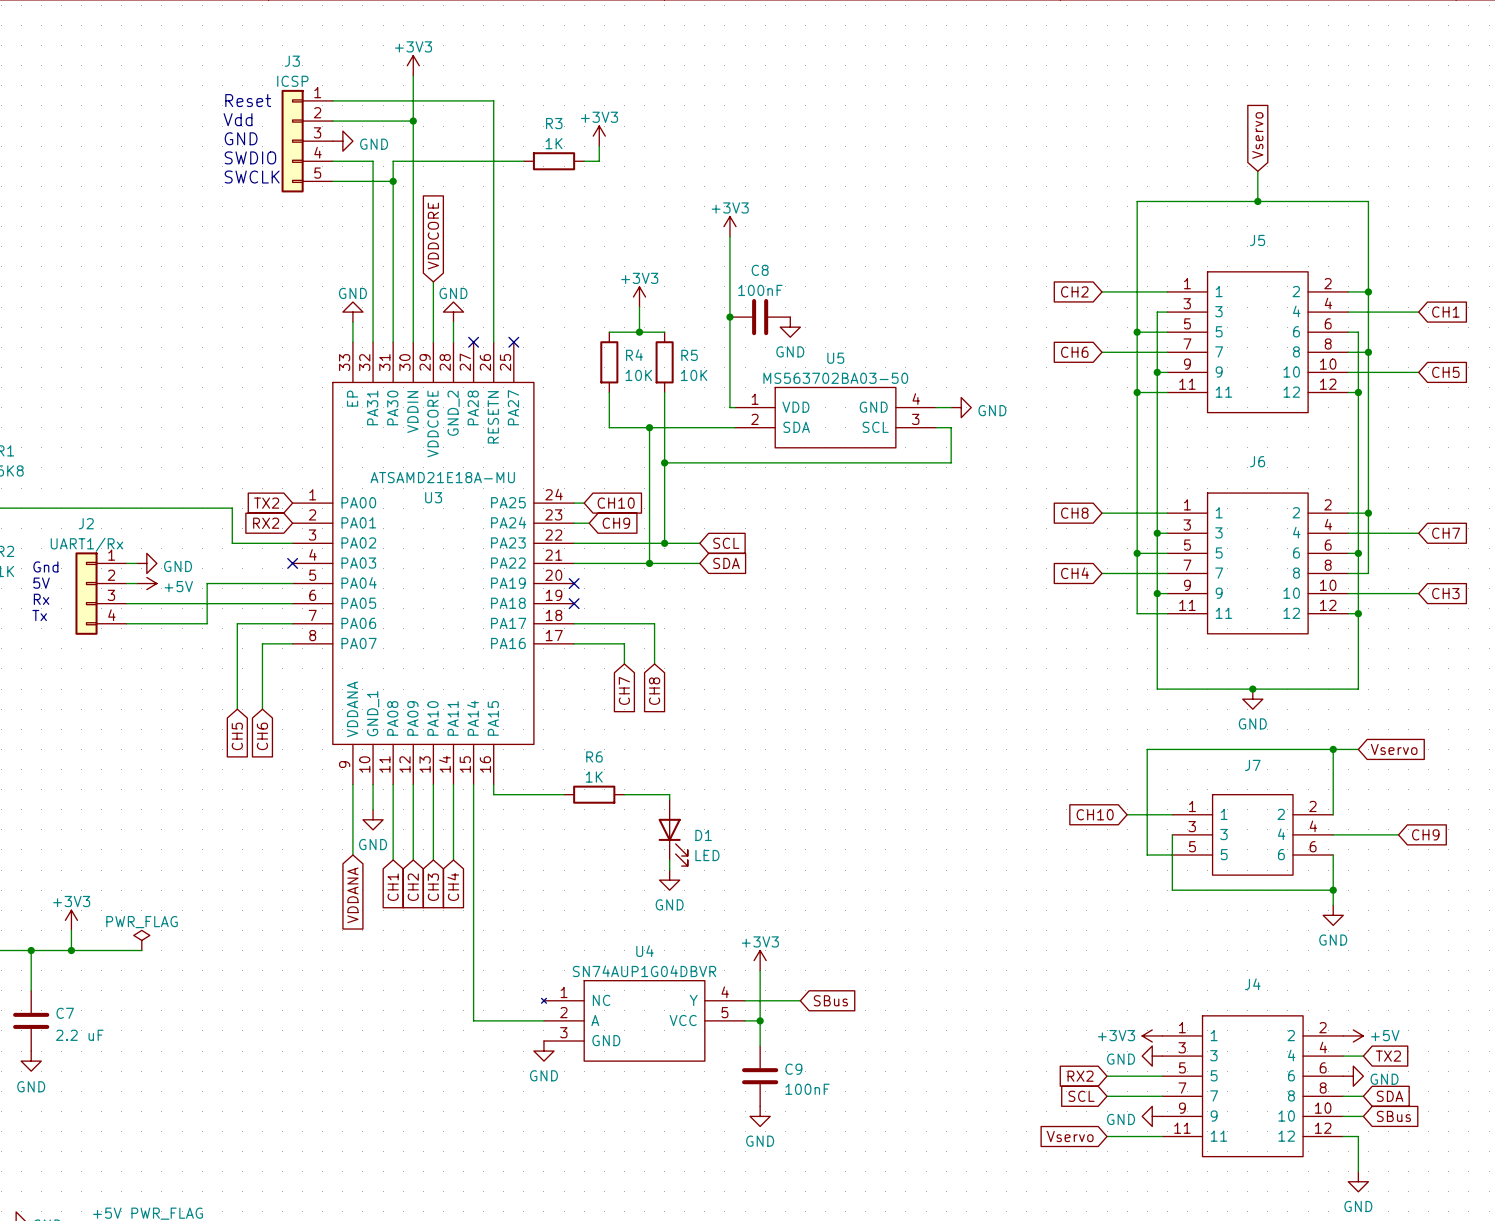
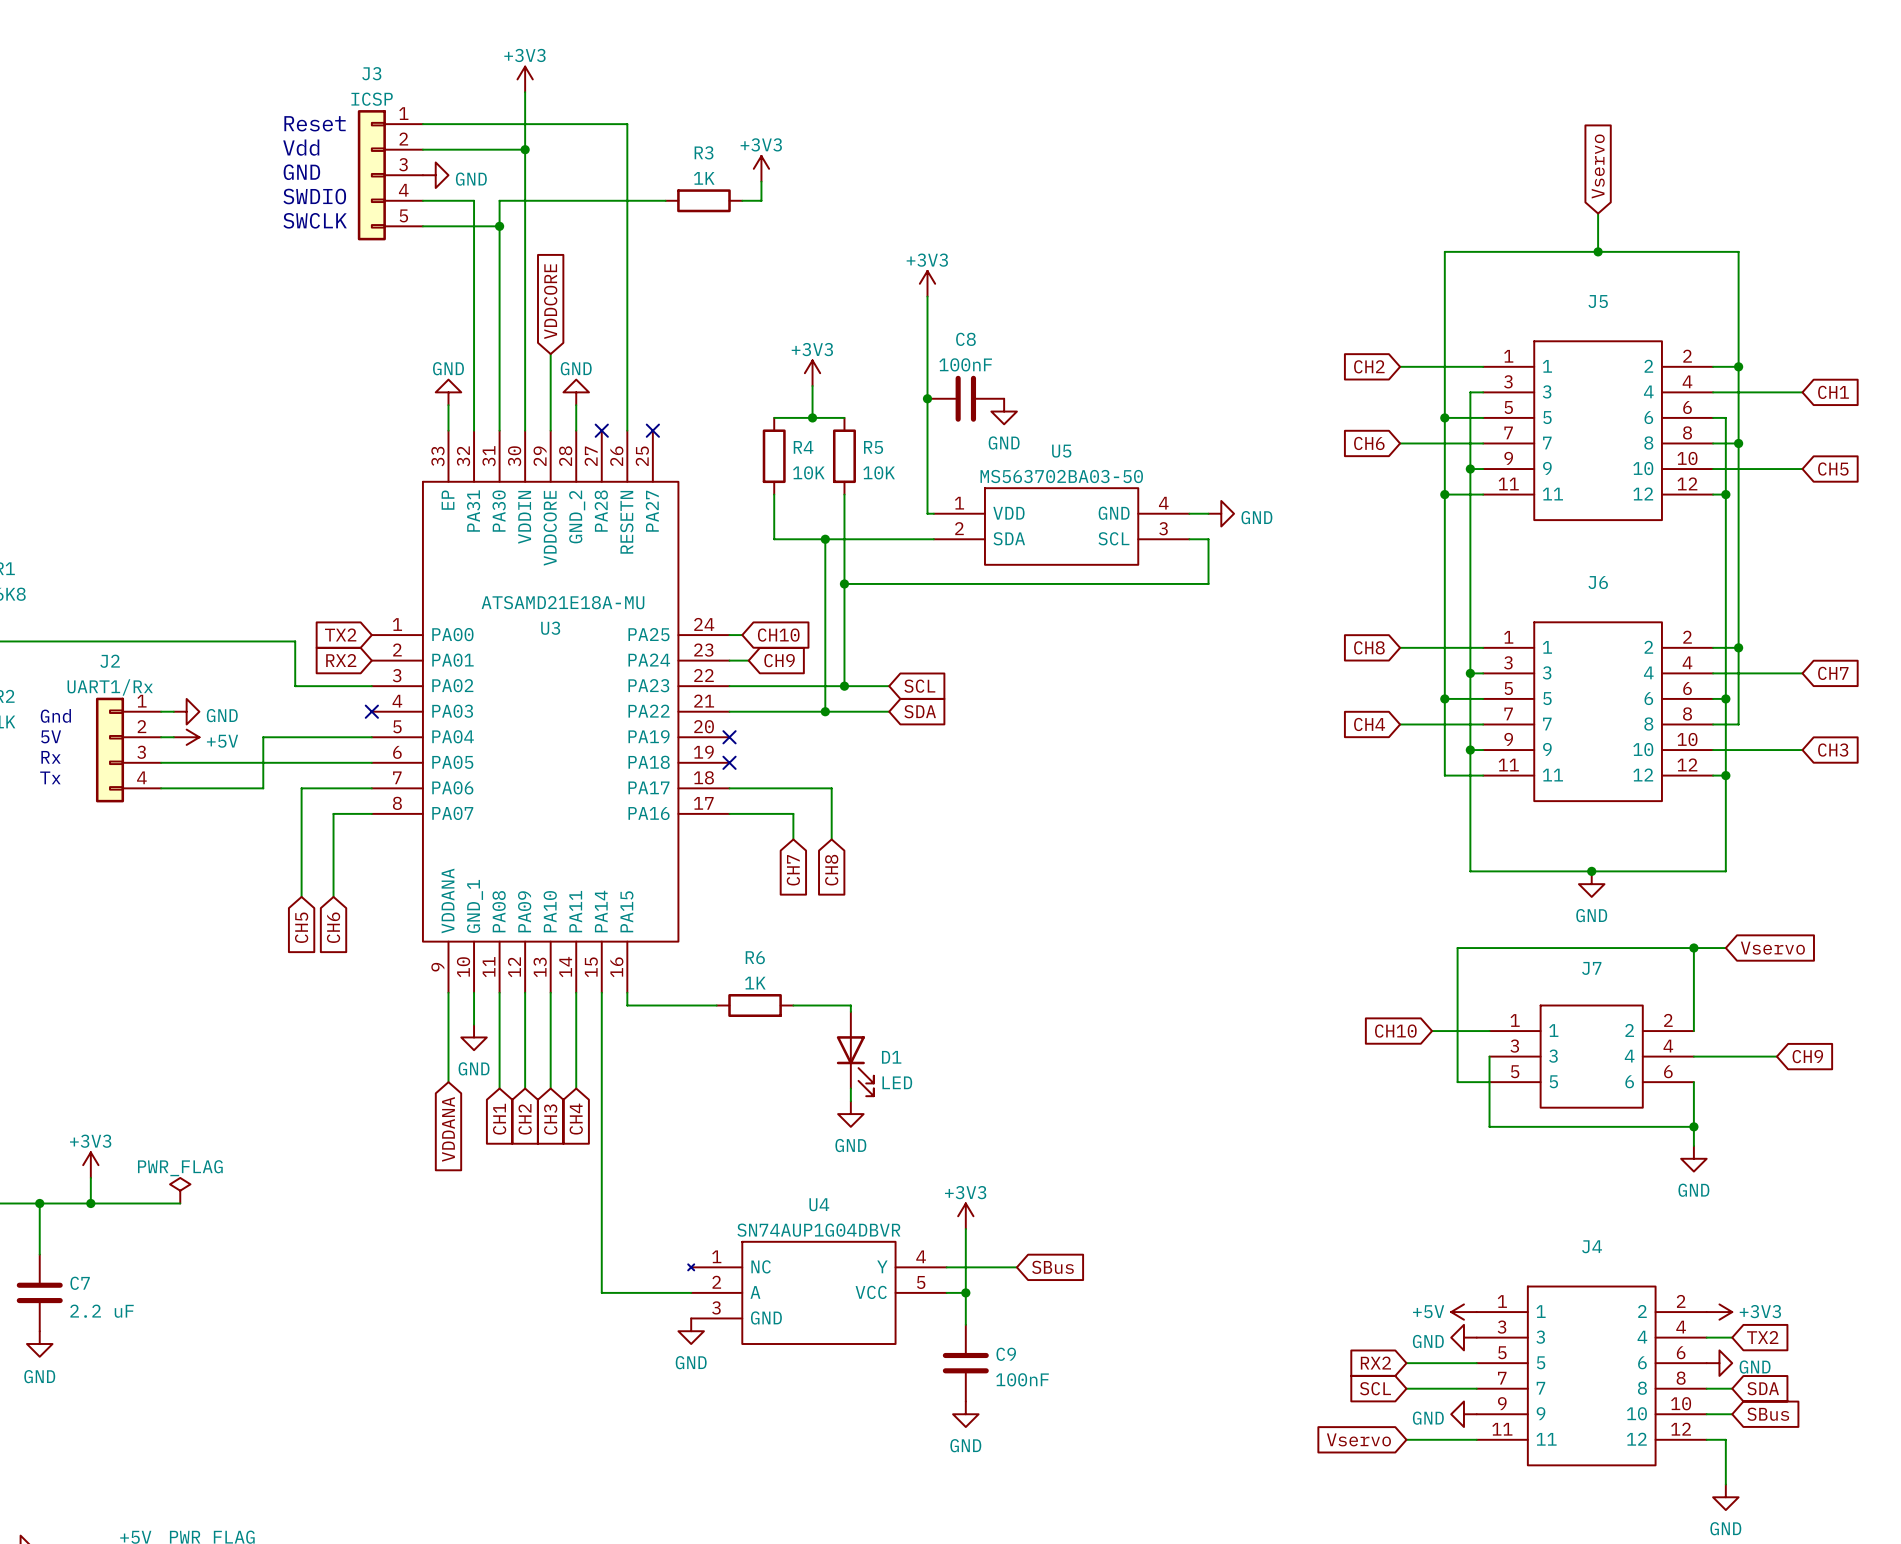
power symbol: +3V3 (1152, 1035) -> +5V (1463, 1312)
power symbol: +5V (1353, 1035) -> +3V3 (1719, 1312)

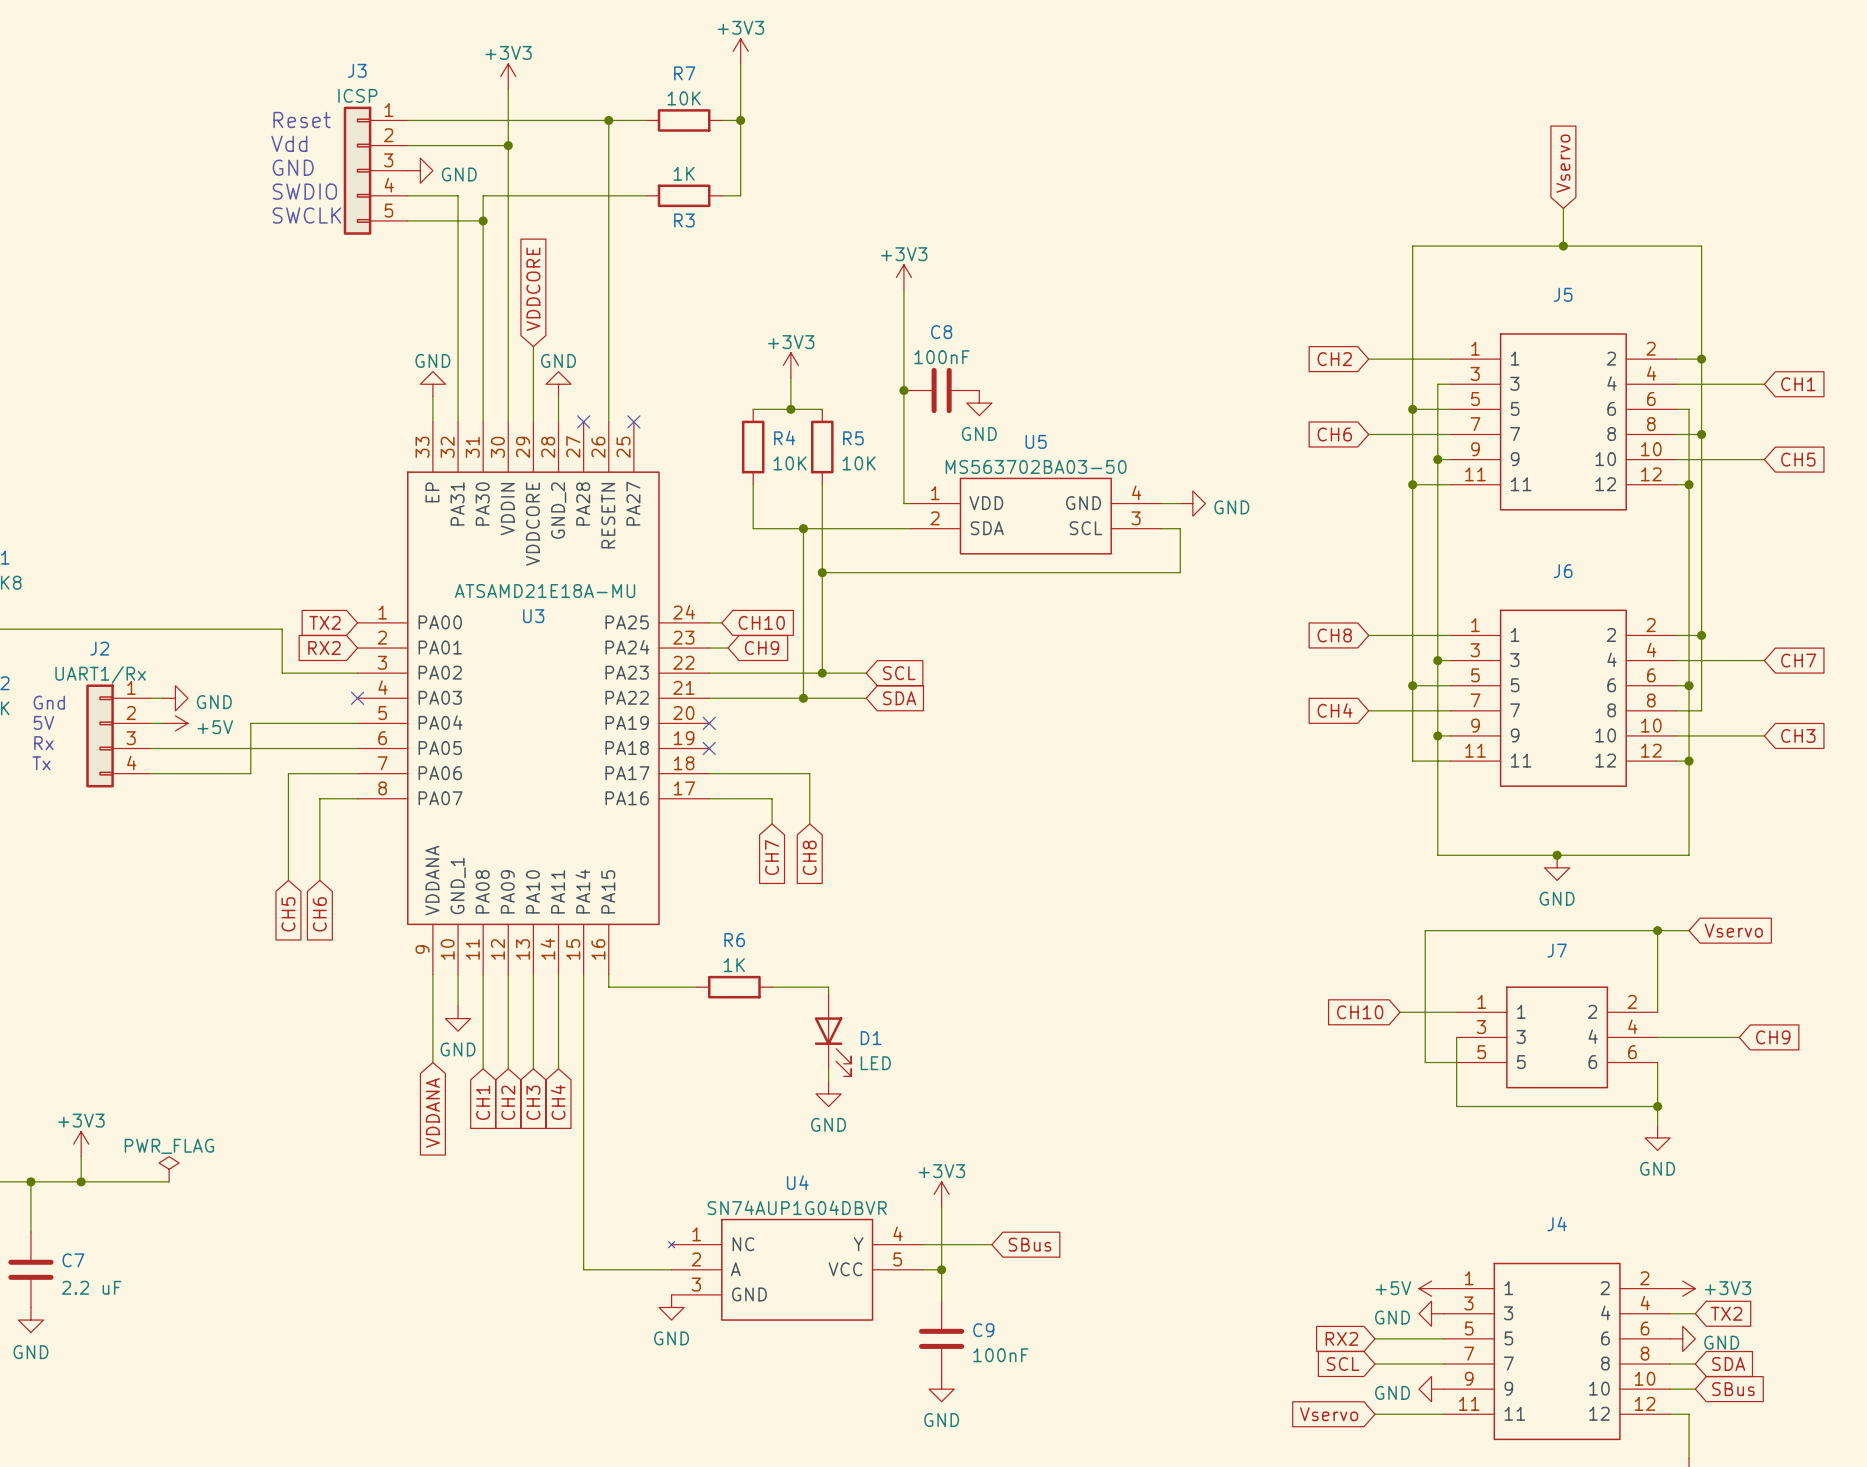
wire: none -> (740, 63) (740, 176)
wire: none -> (608, 120) (646, 120)
junction: none -> (608, 120)
R7: none -> 10K (684, 120)
wire: none -> (721, 120) (740, 120)
junction: none -> (740, 120)
R3 name position: R3 (704, 152) -> R3 (684, 220)
power symbol position: +3V3 (761, 168) -> +3V3 (740, 51)

